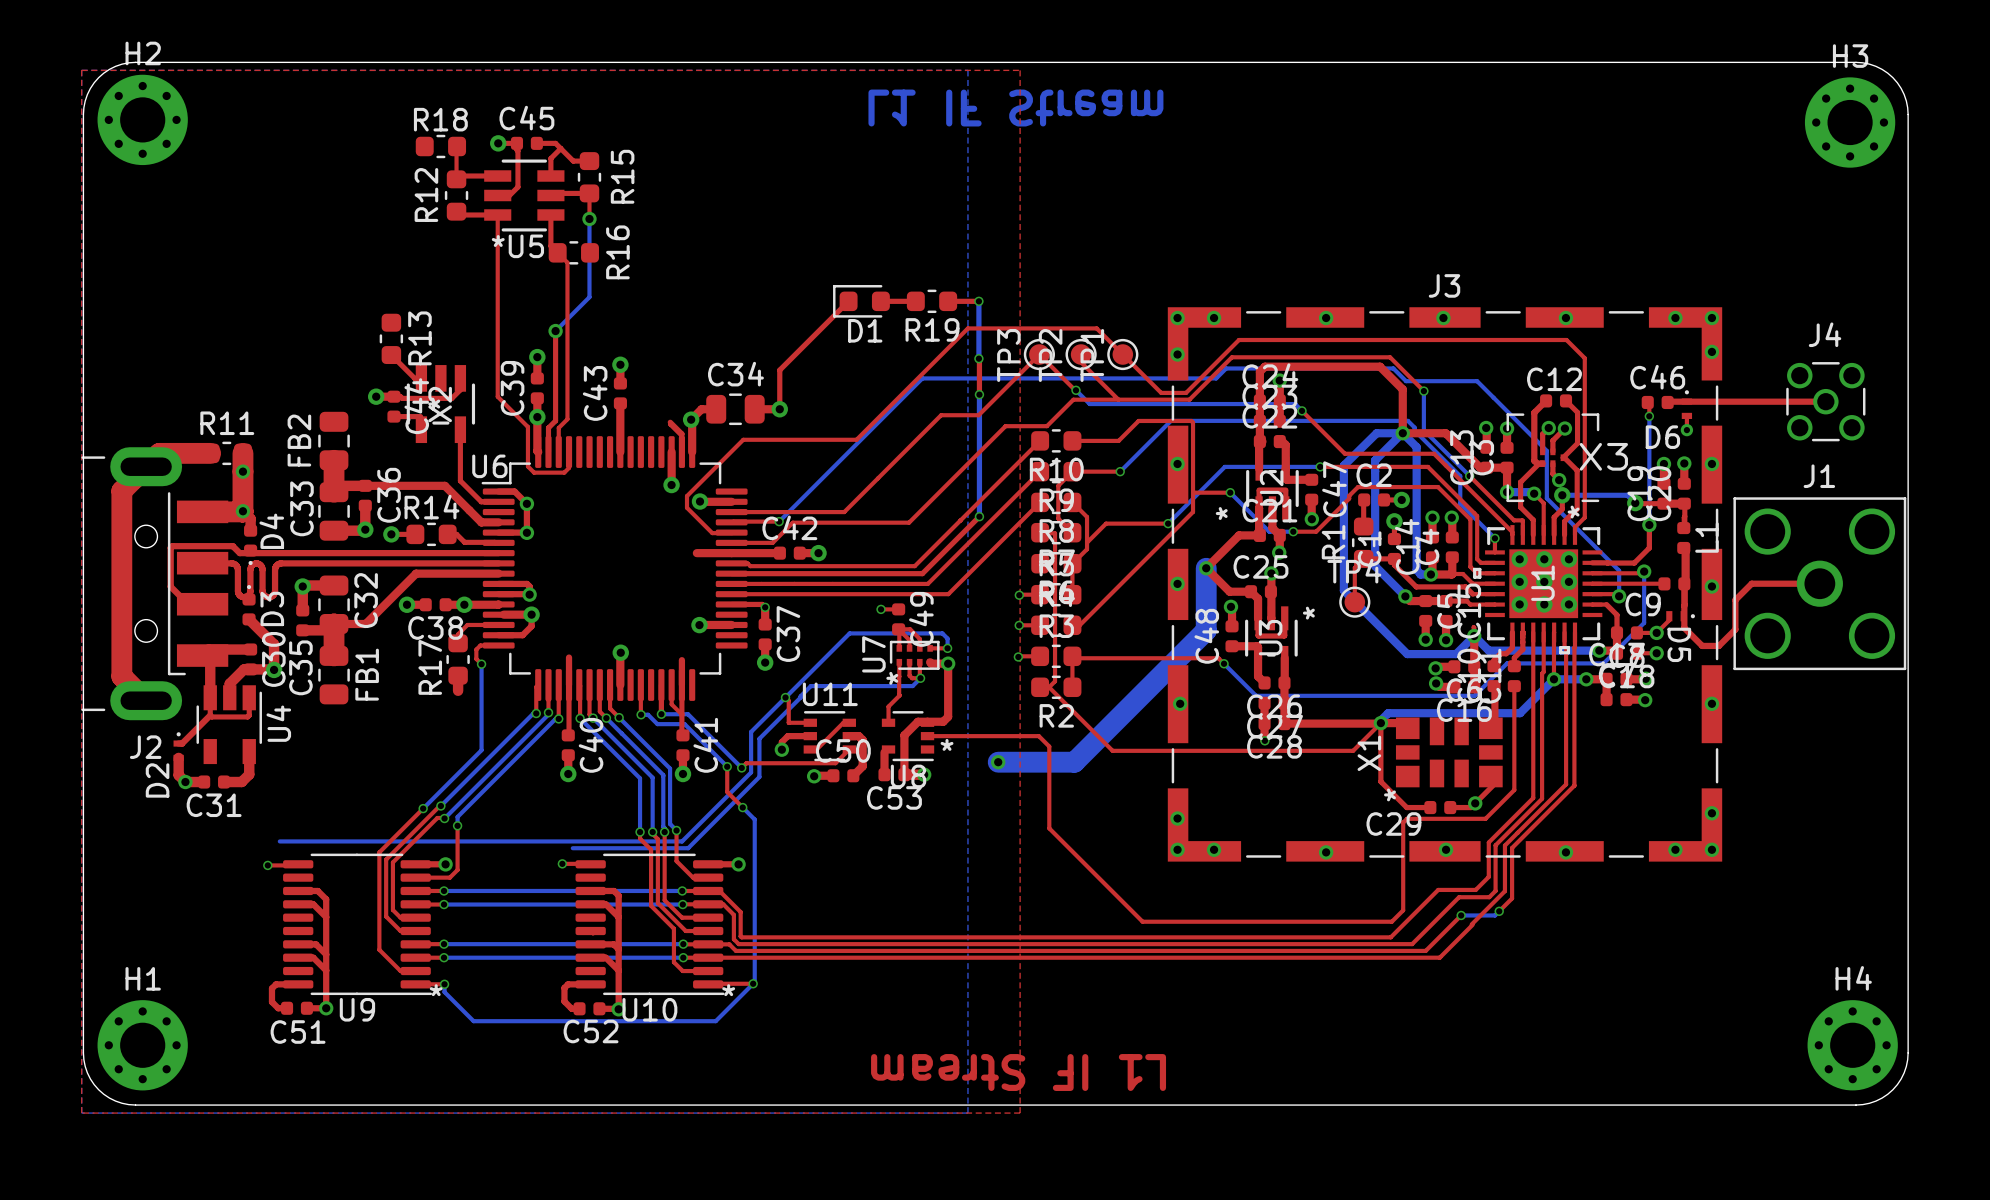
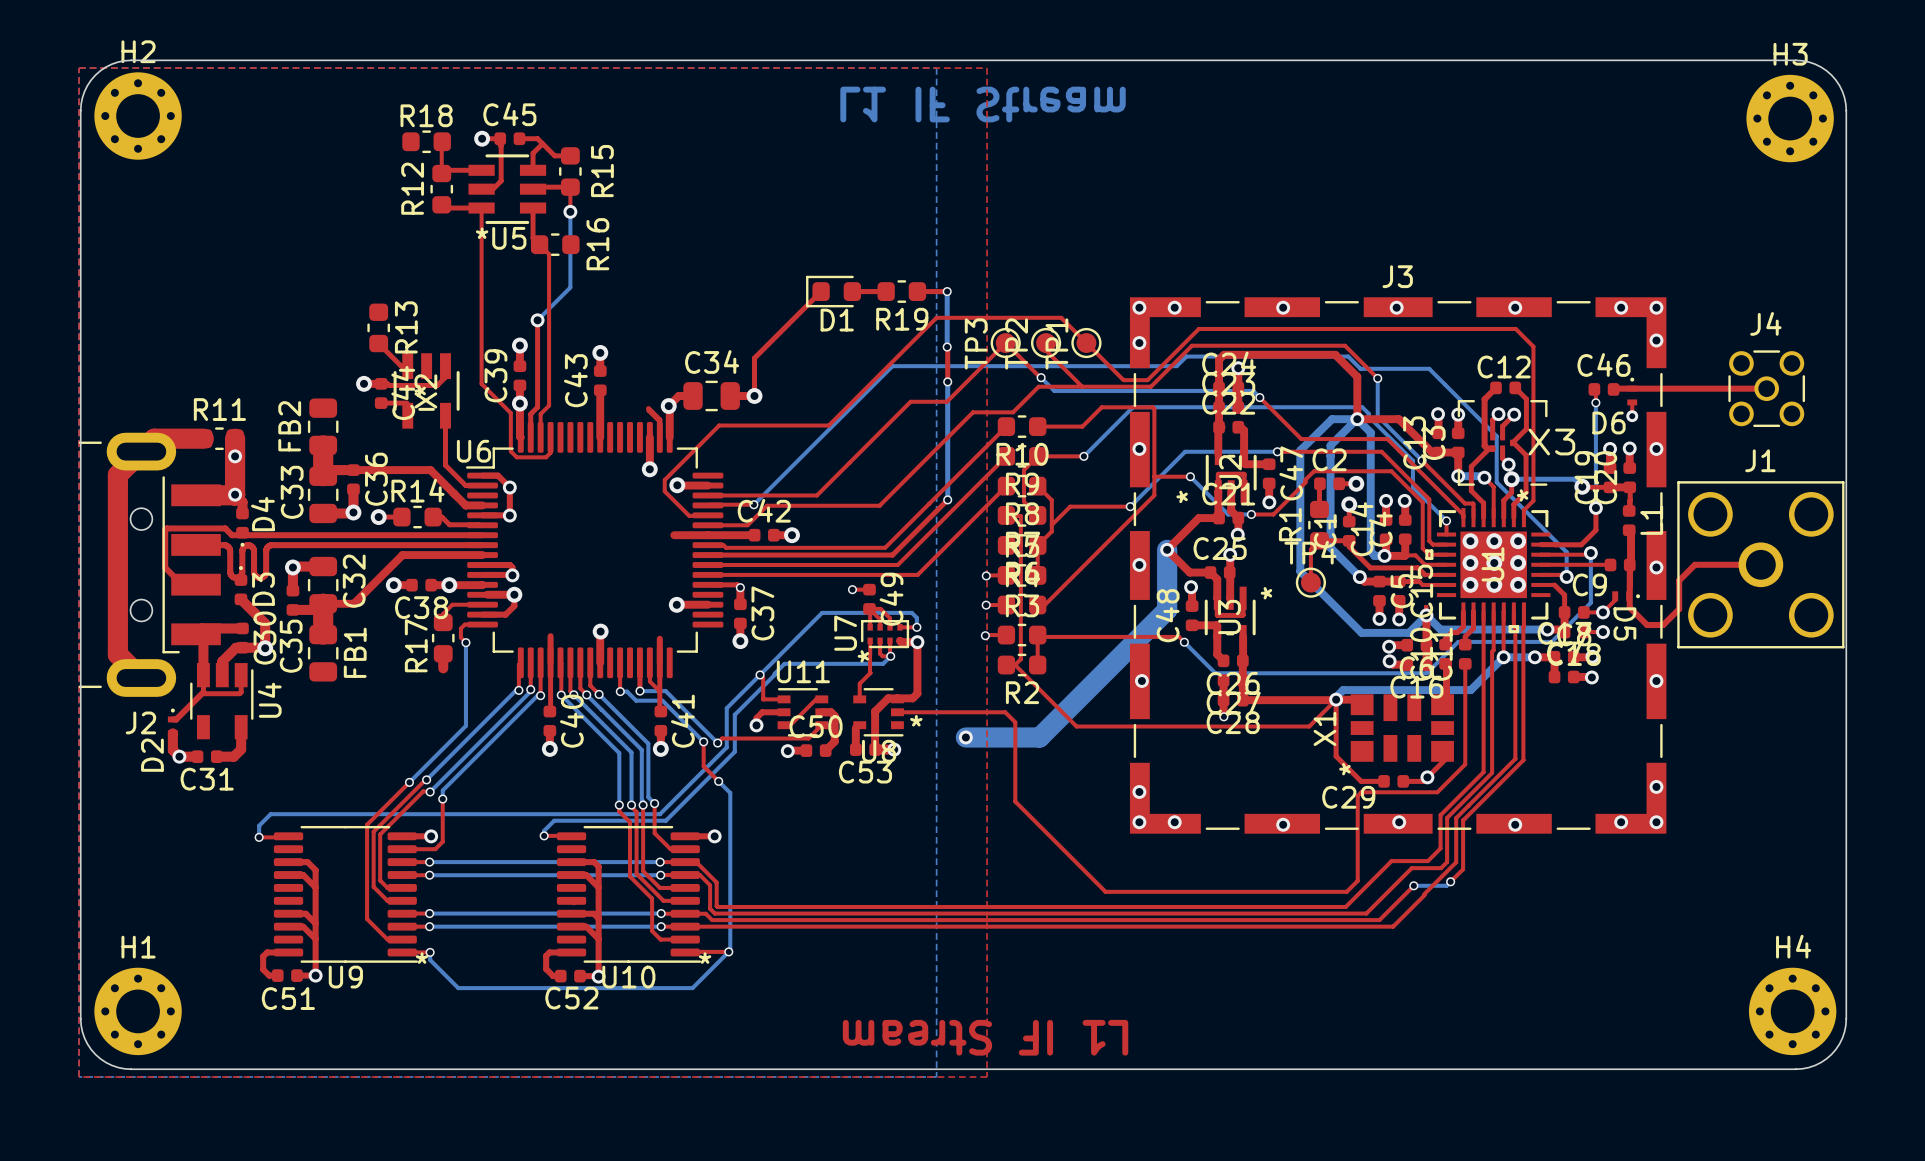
bottom track: none -> (270, 814) (259, 825) (259, 837)
bottom track: none -> (554, 820) (544, 830) (544, 835)

